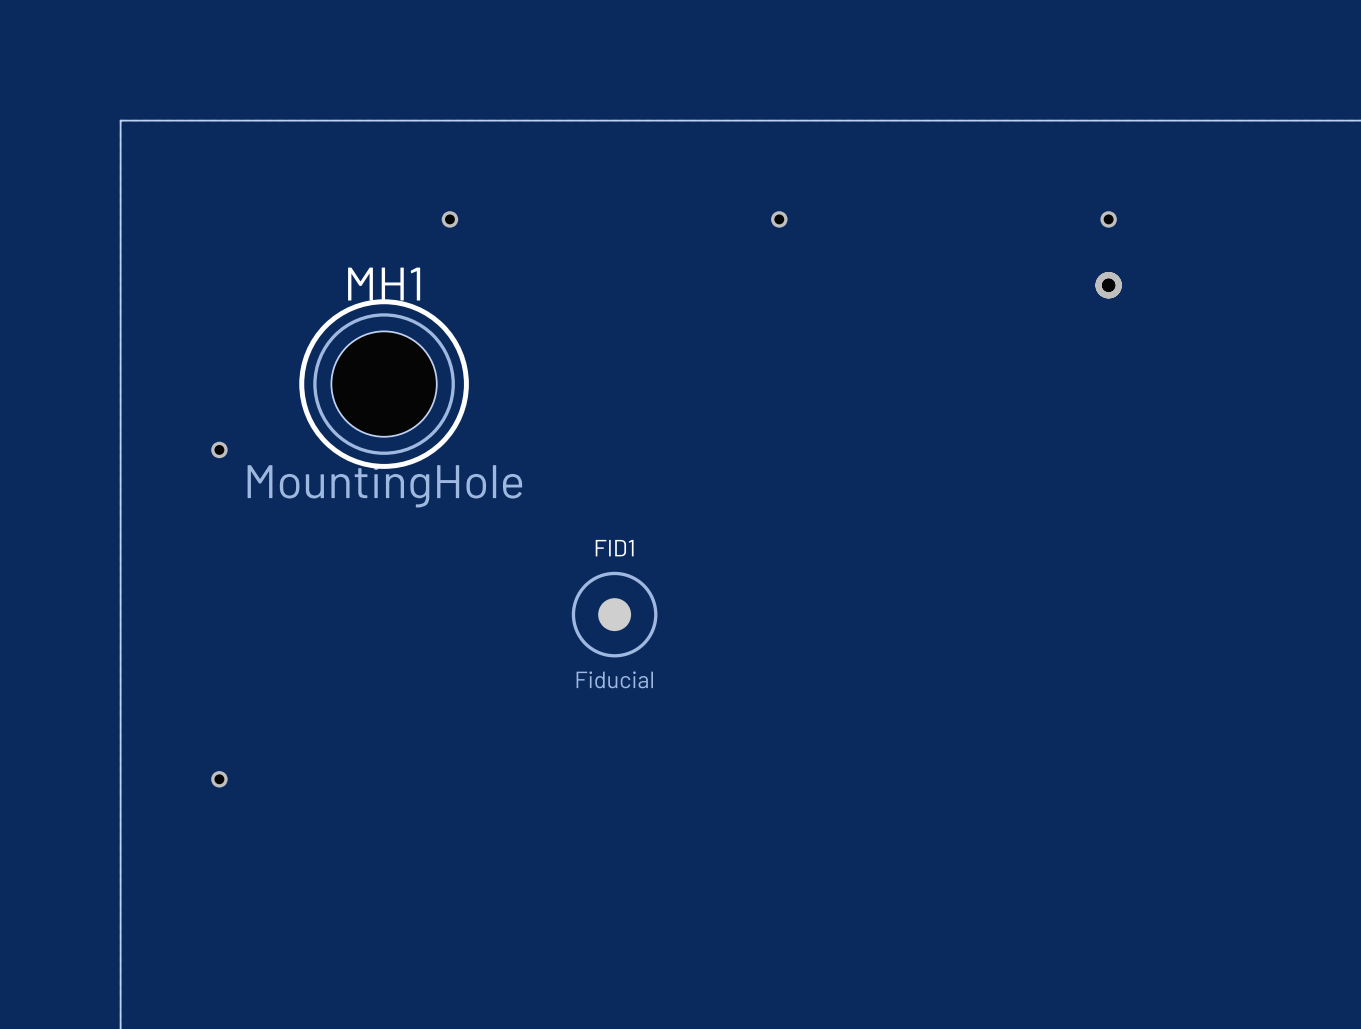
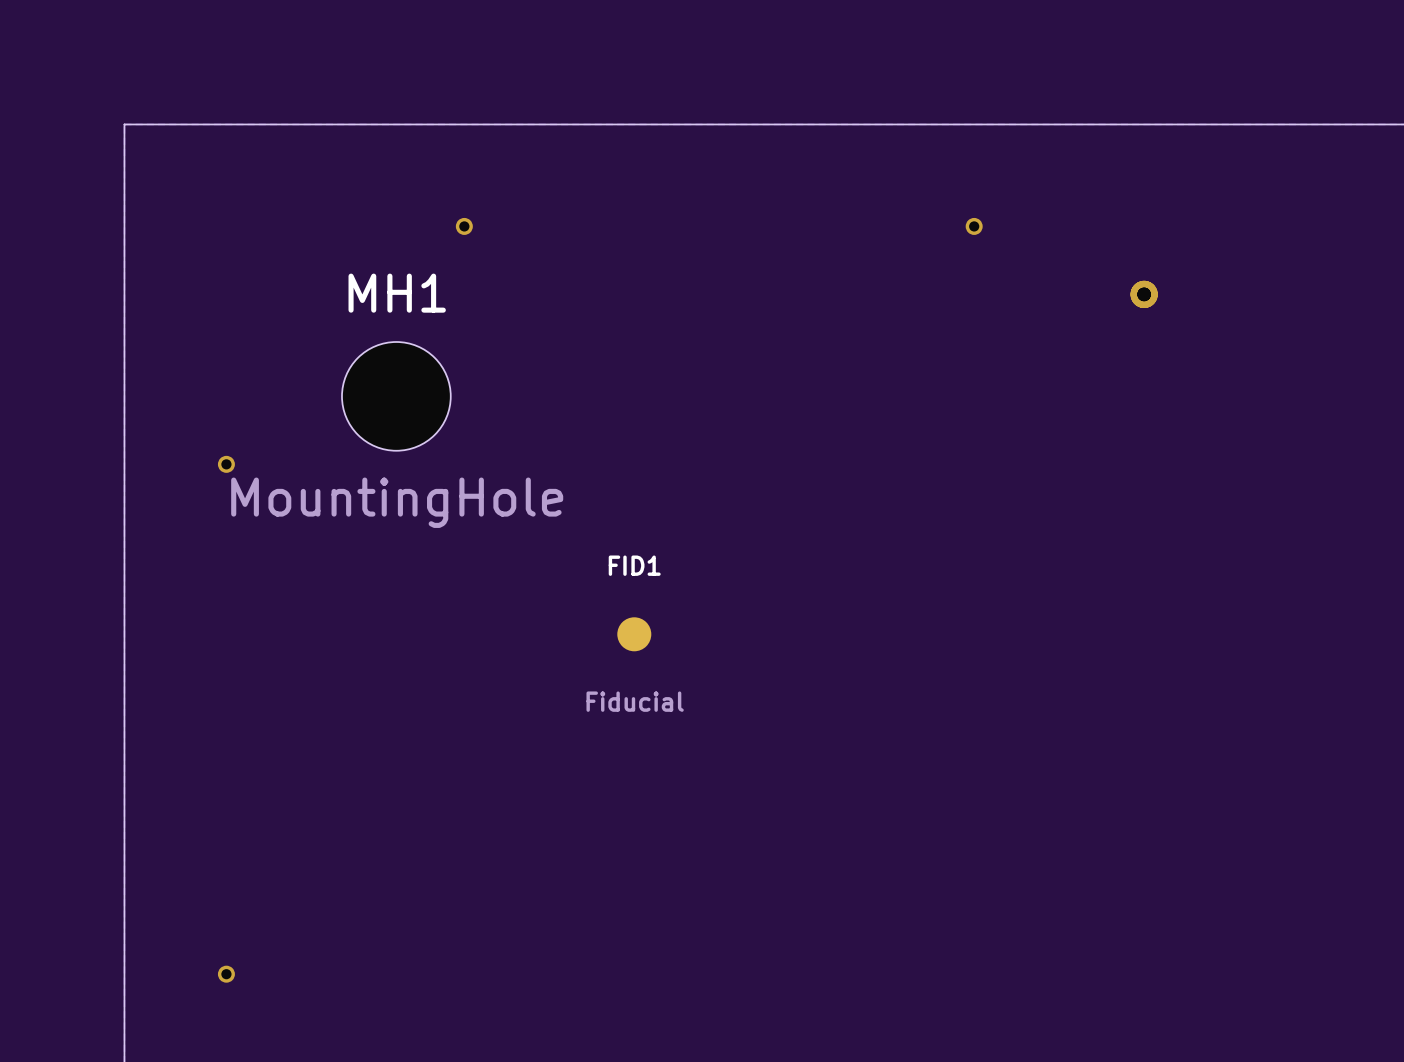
via: (779, 219) -> none
via: none -> (974, 226)
via: (1108, 219) -> none
MH1 footprint: [299, 299, 469, 469] -> [341, 341, 451, 451]
FID1 footprint: [571, 571, 658, 658] -> [617, 617, 652, 652]
via position: (219, 779) -> (226, 974)

